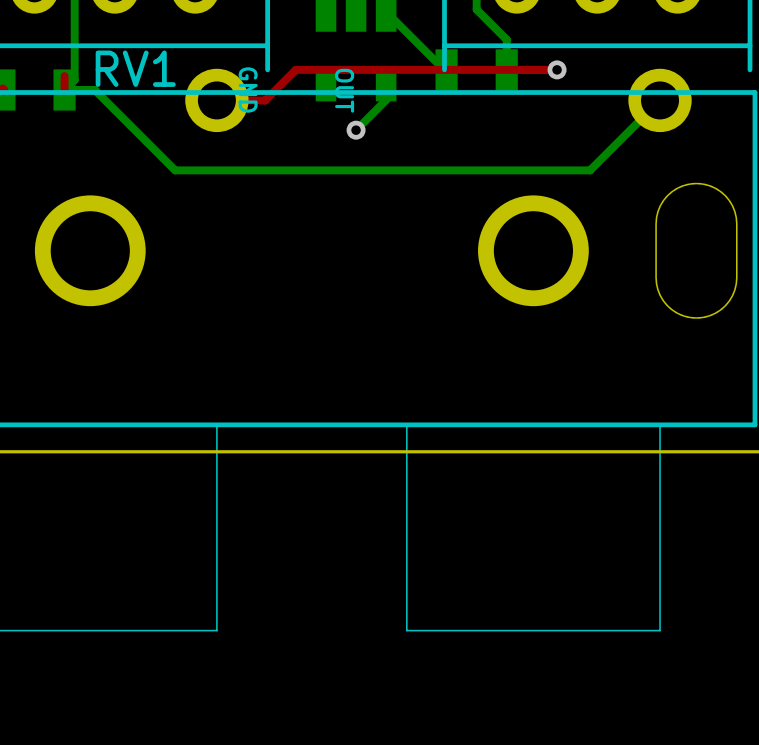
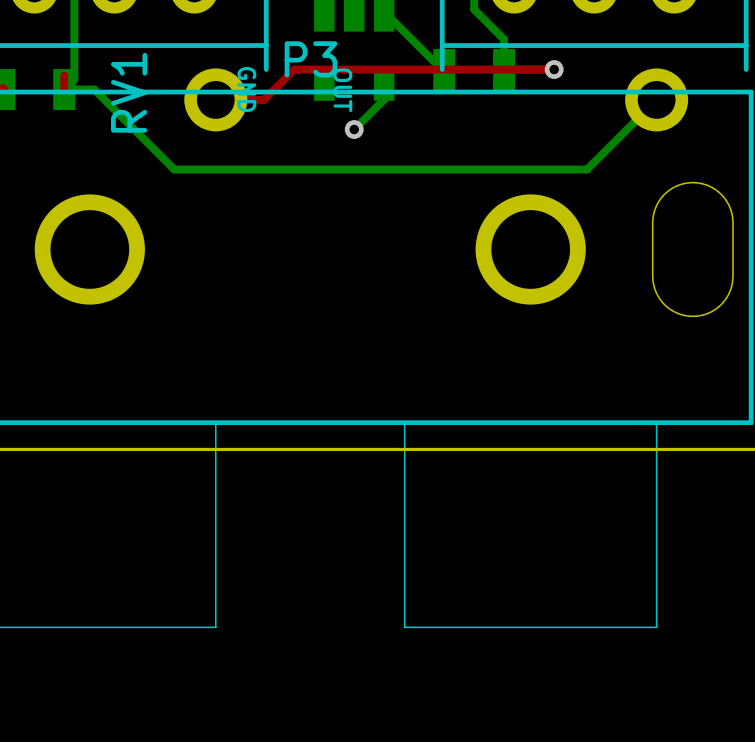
P3 name: none -> P3 (311, 59)
RV1 name rotation: 0° (135, 68) -> 90° counterclockwise (129, 92)

